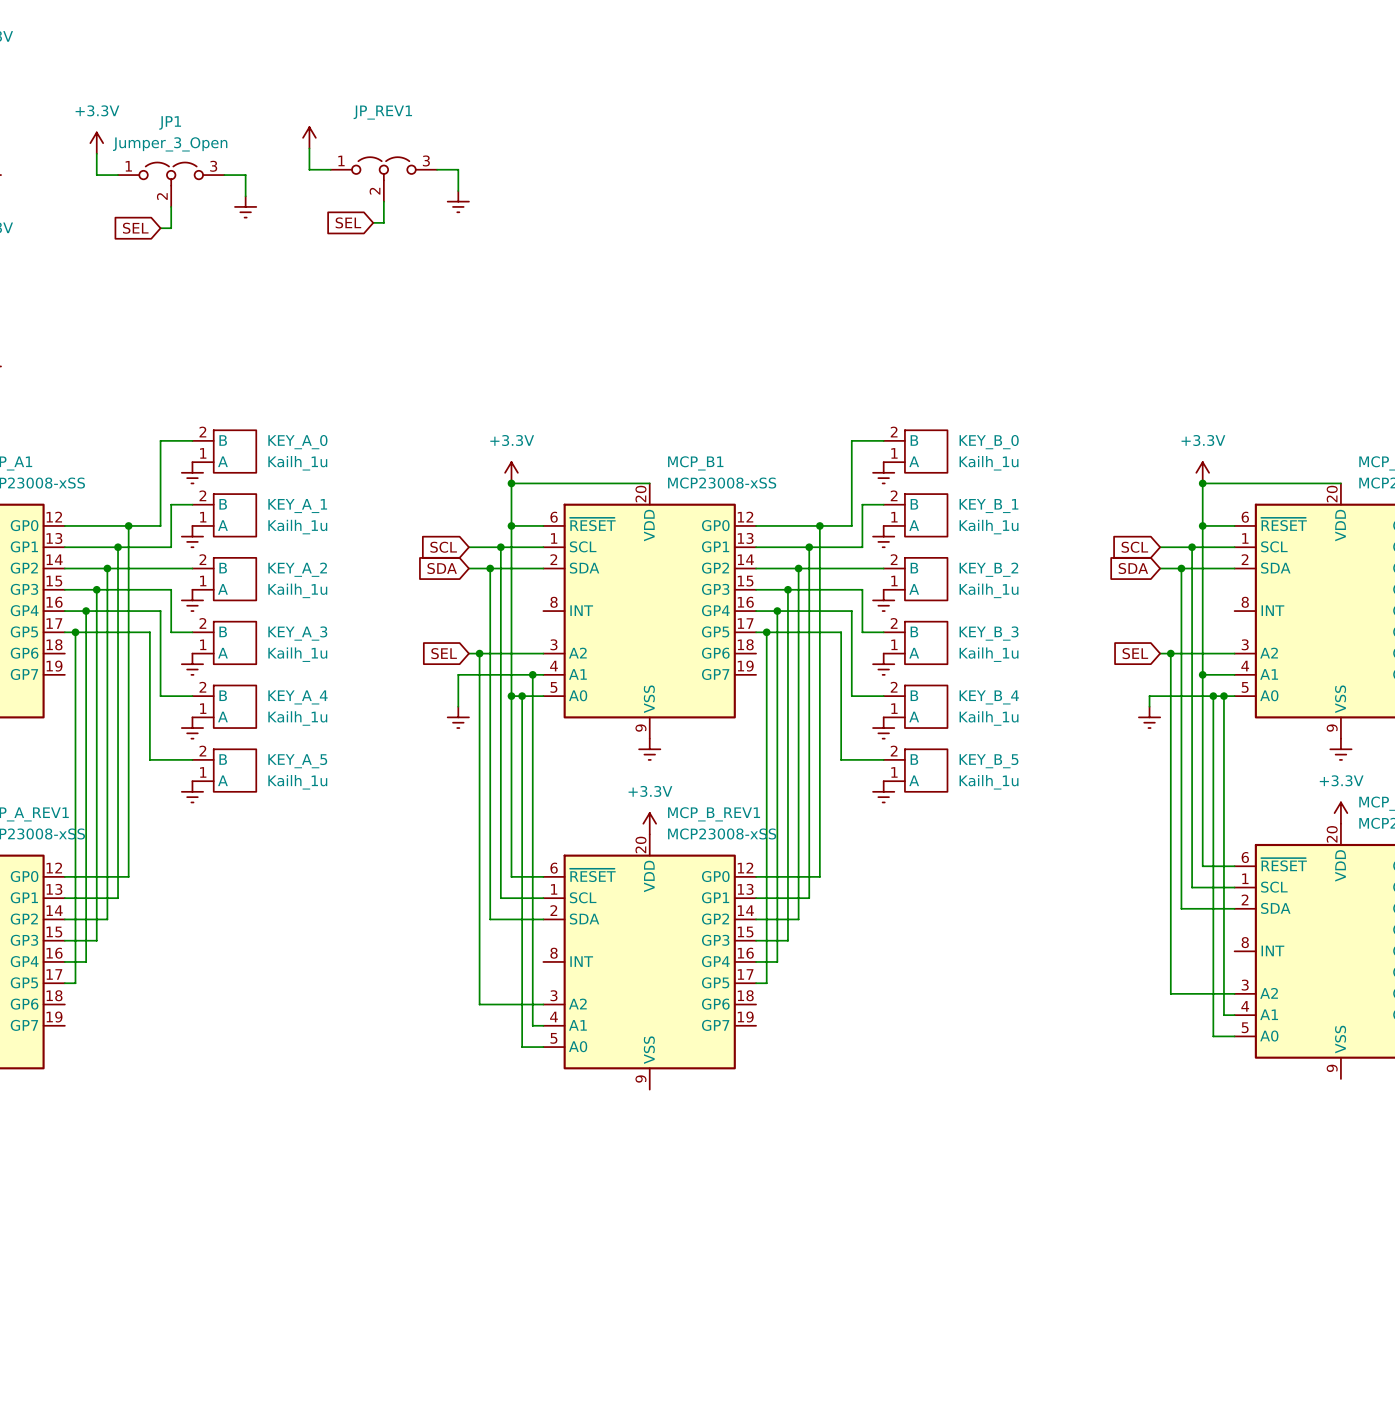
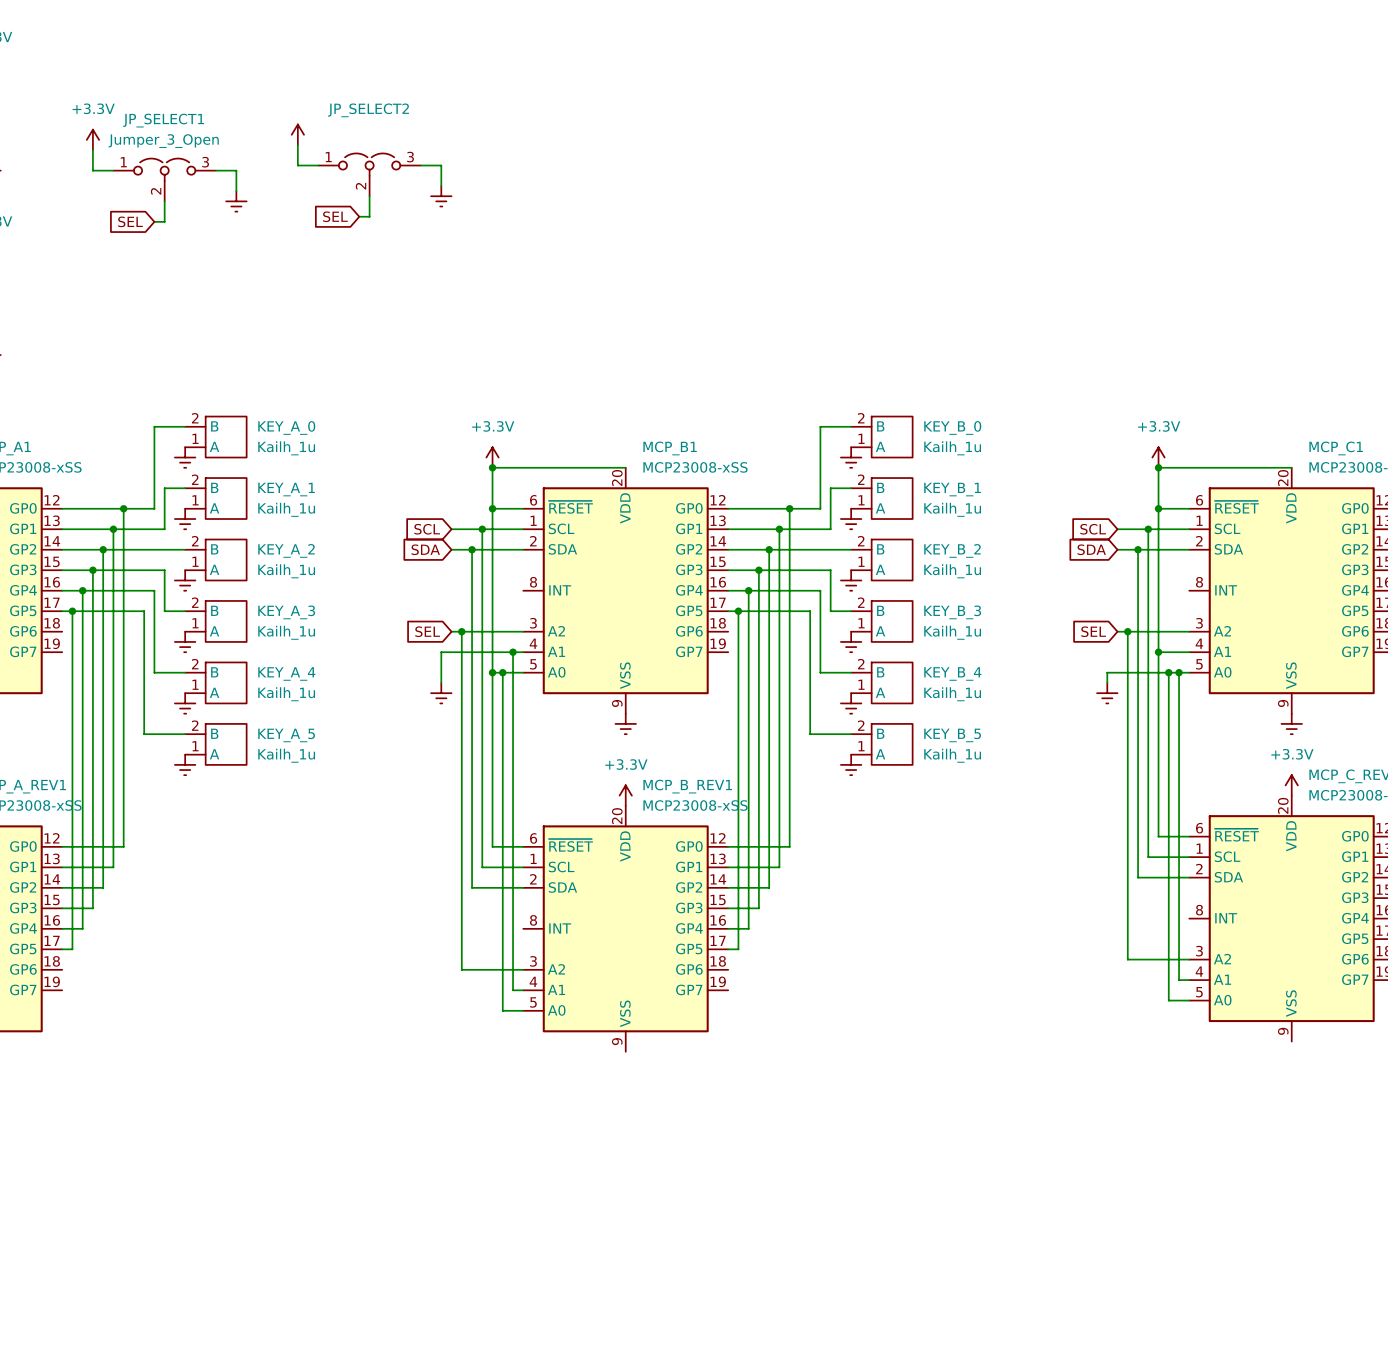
JP_REV1 name: JP_REV1 (382, 112) -> JP_SELECT2 (368, 110)
JP1 name: JP1 (170, 122) -> JP_SELECT1 (163, 120)

